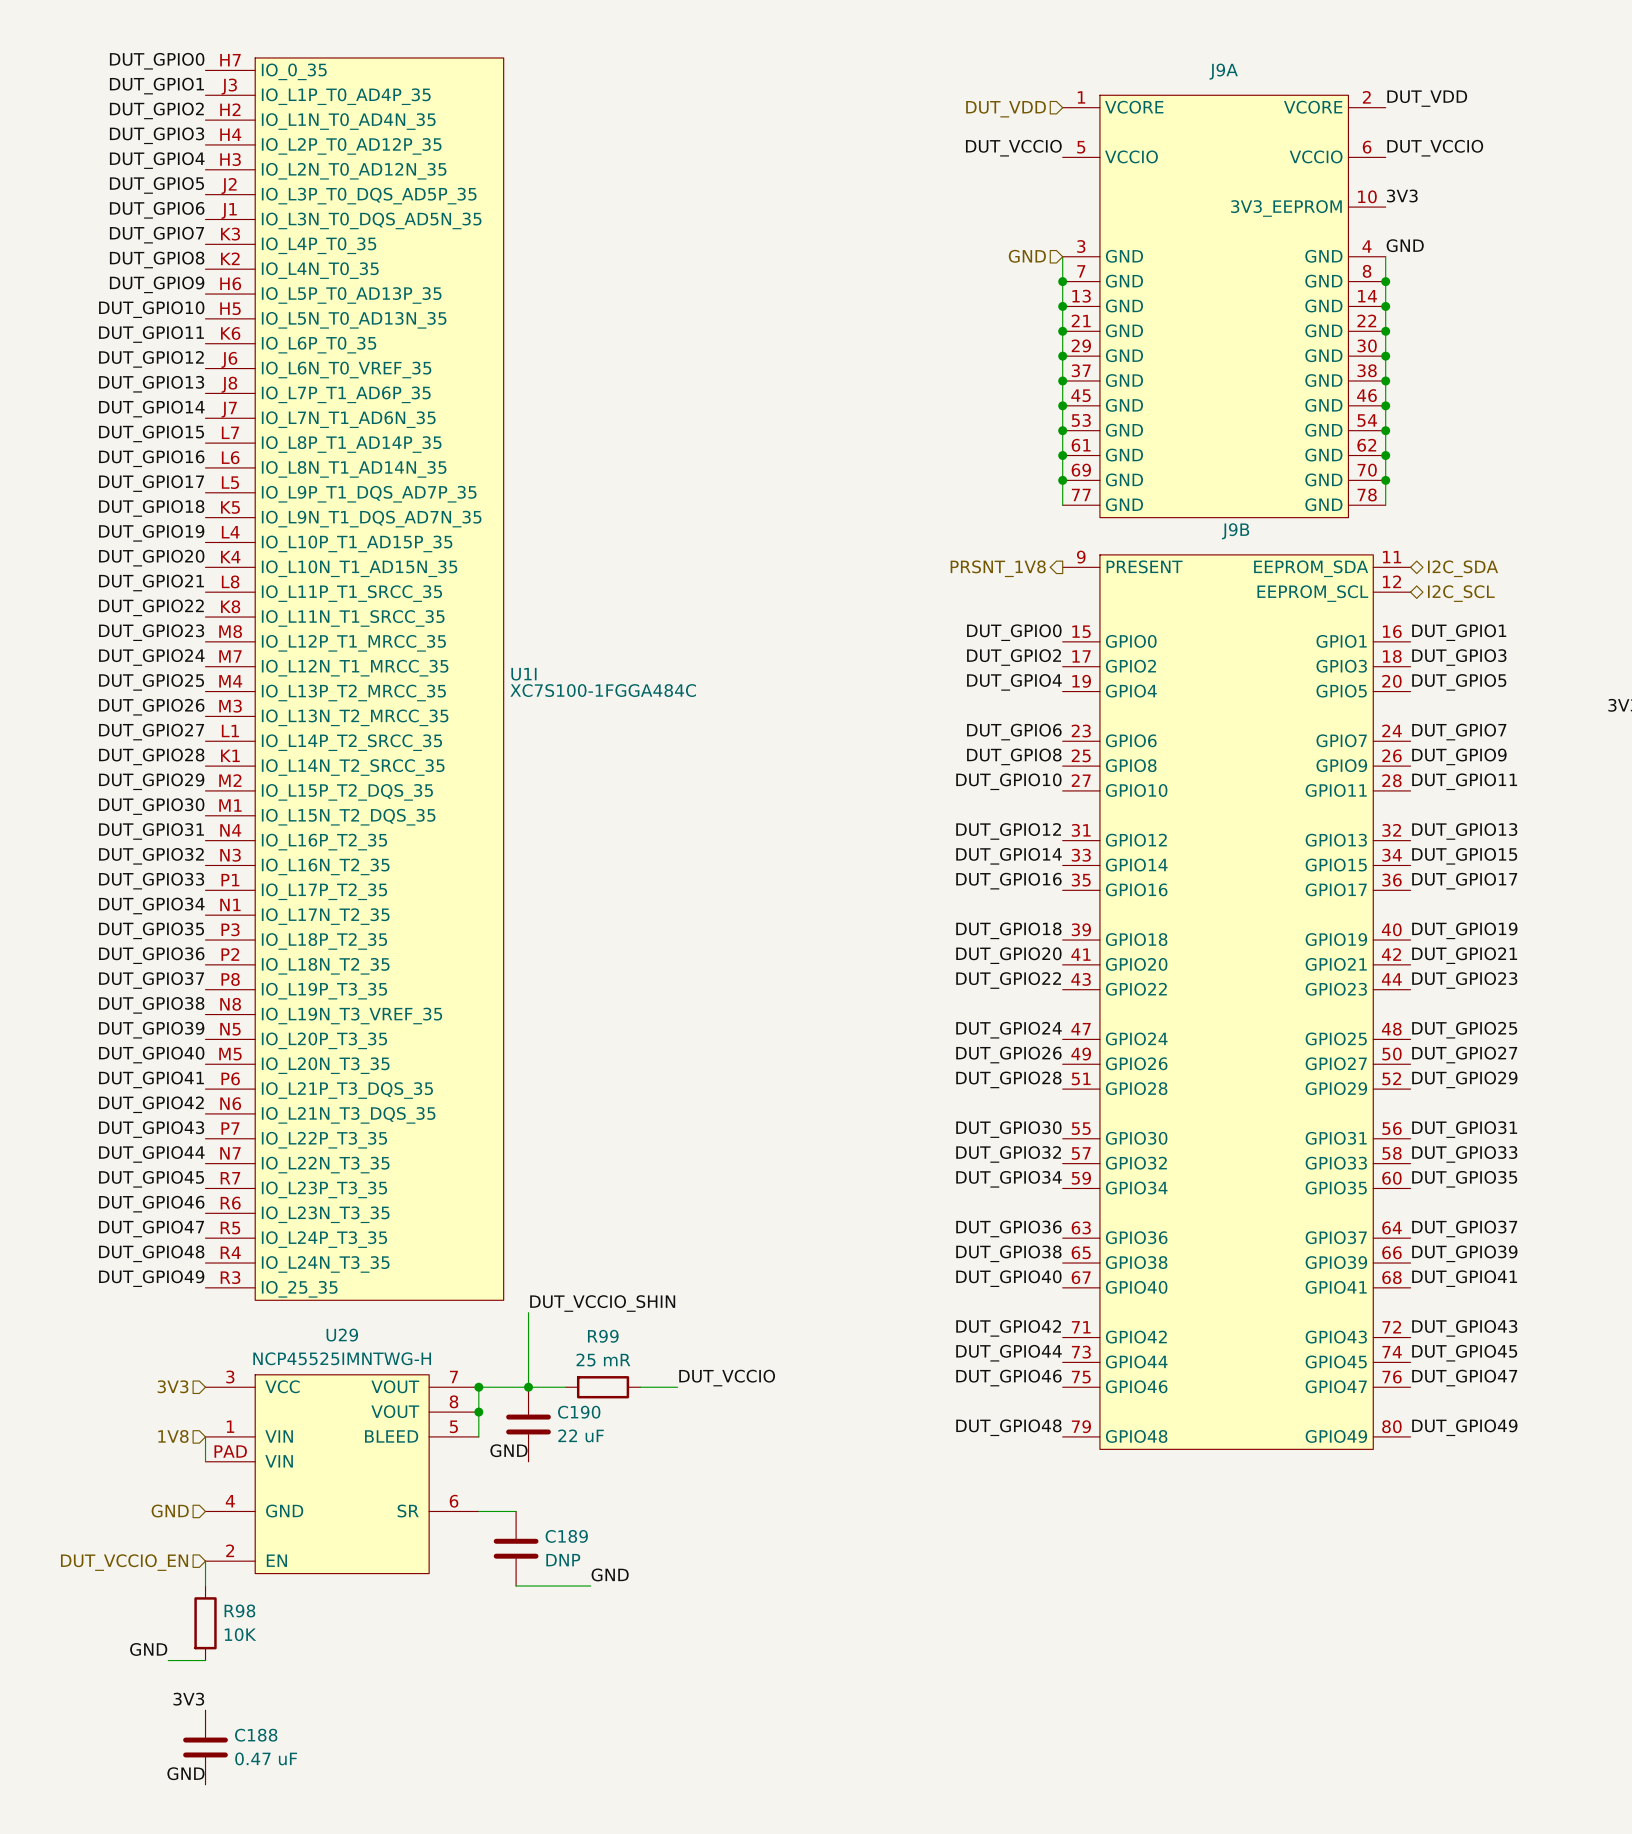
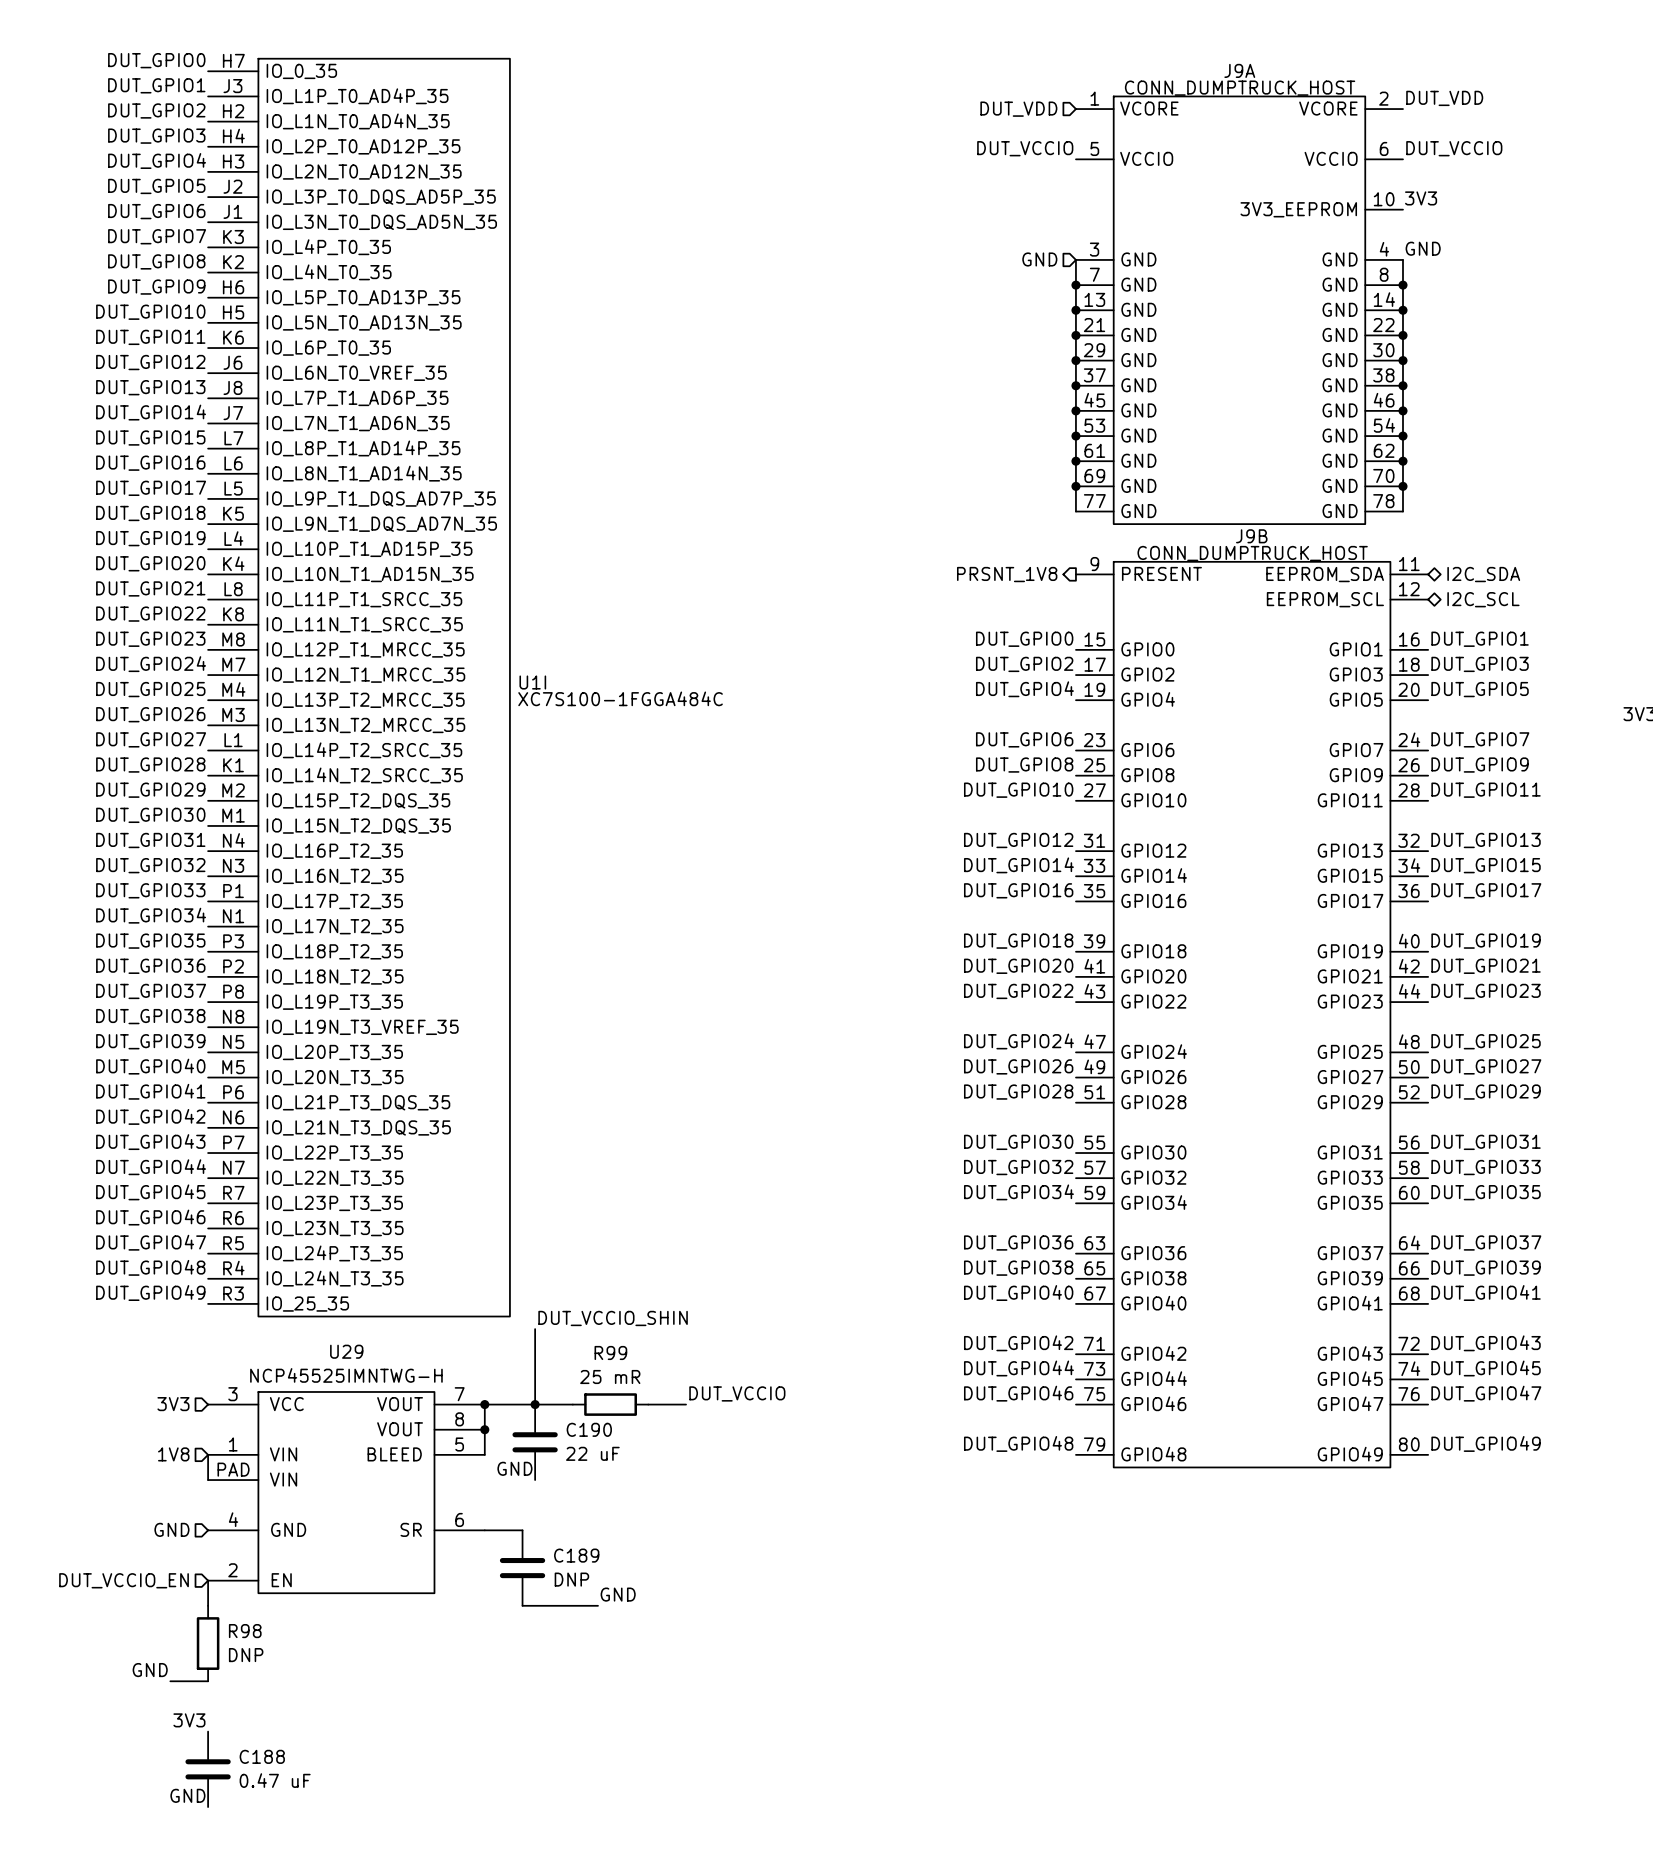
J9A value: none -> CONN_DUMPTRUCK_HOST (1240, 88)
J9B value: none -> CONN_DUMPTRUCK_HOST (1252, 553)
R98 value: 10K (240, 1634) -> DNP (246, 1655)

